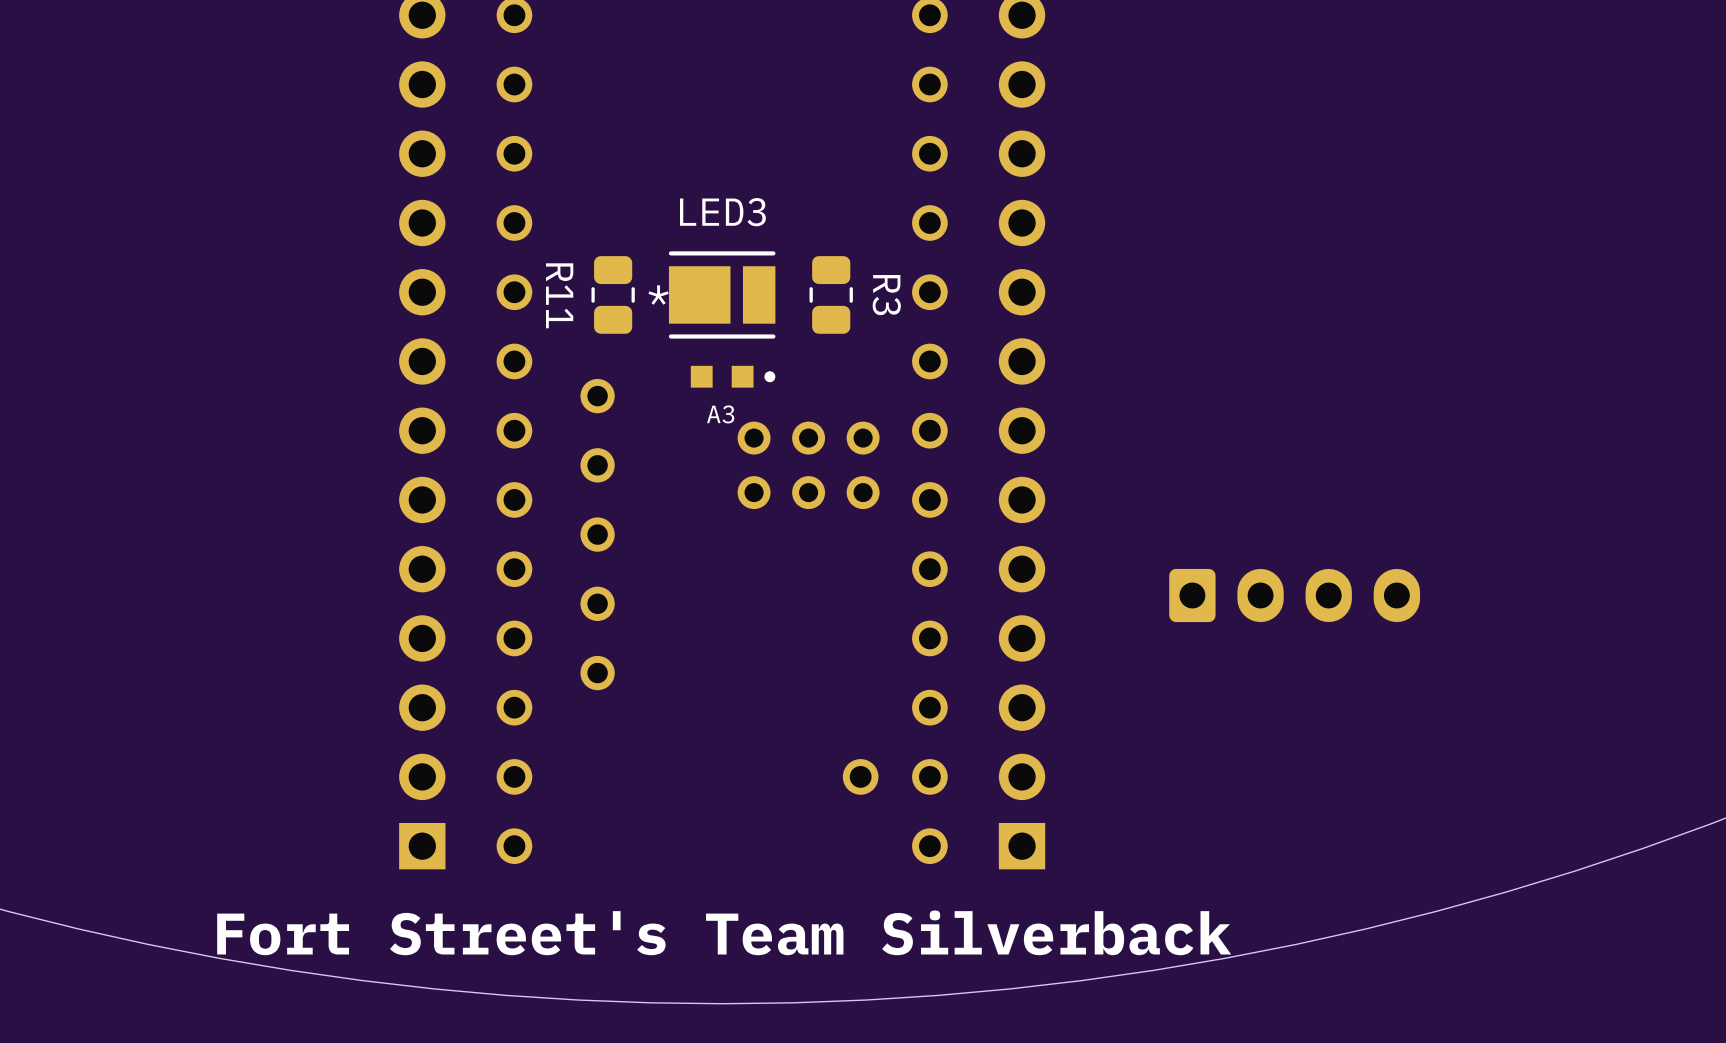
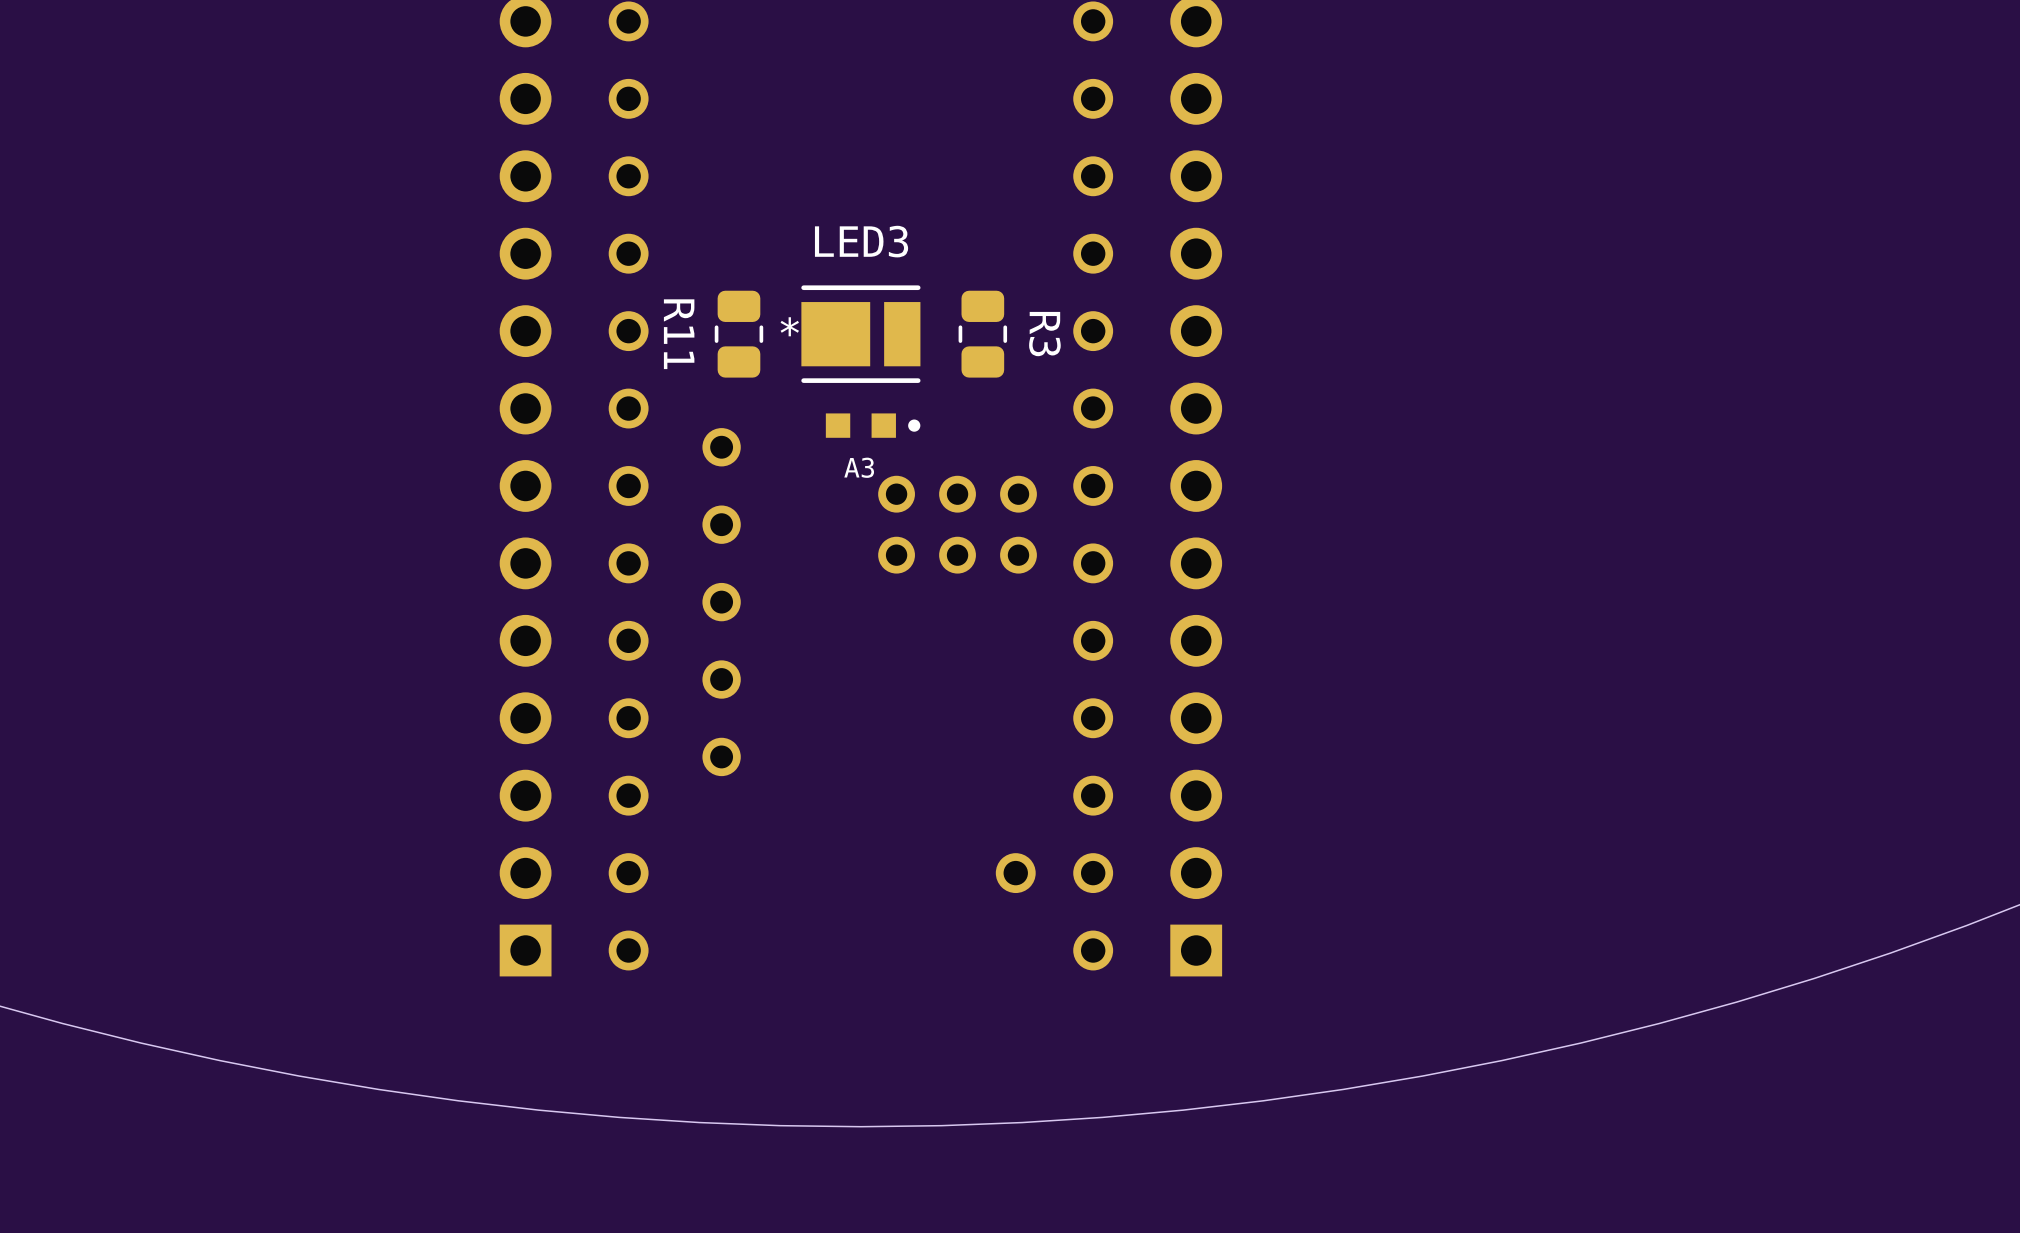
part: (1294, 595) -> none
text: Fort Street's Team Silverback (724, 932) -> none

